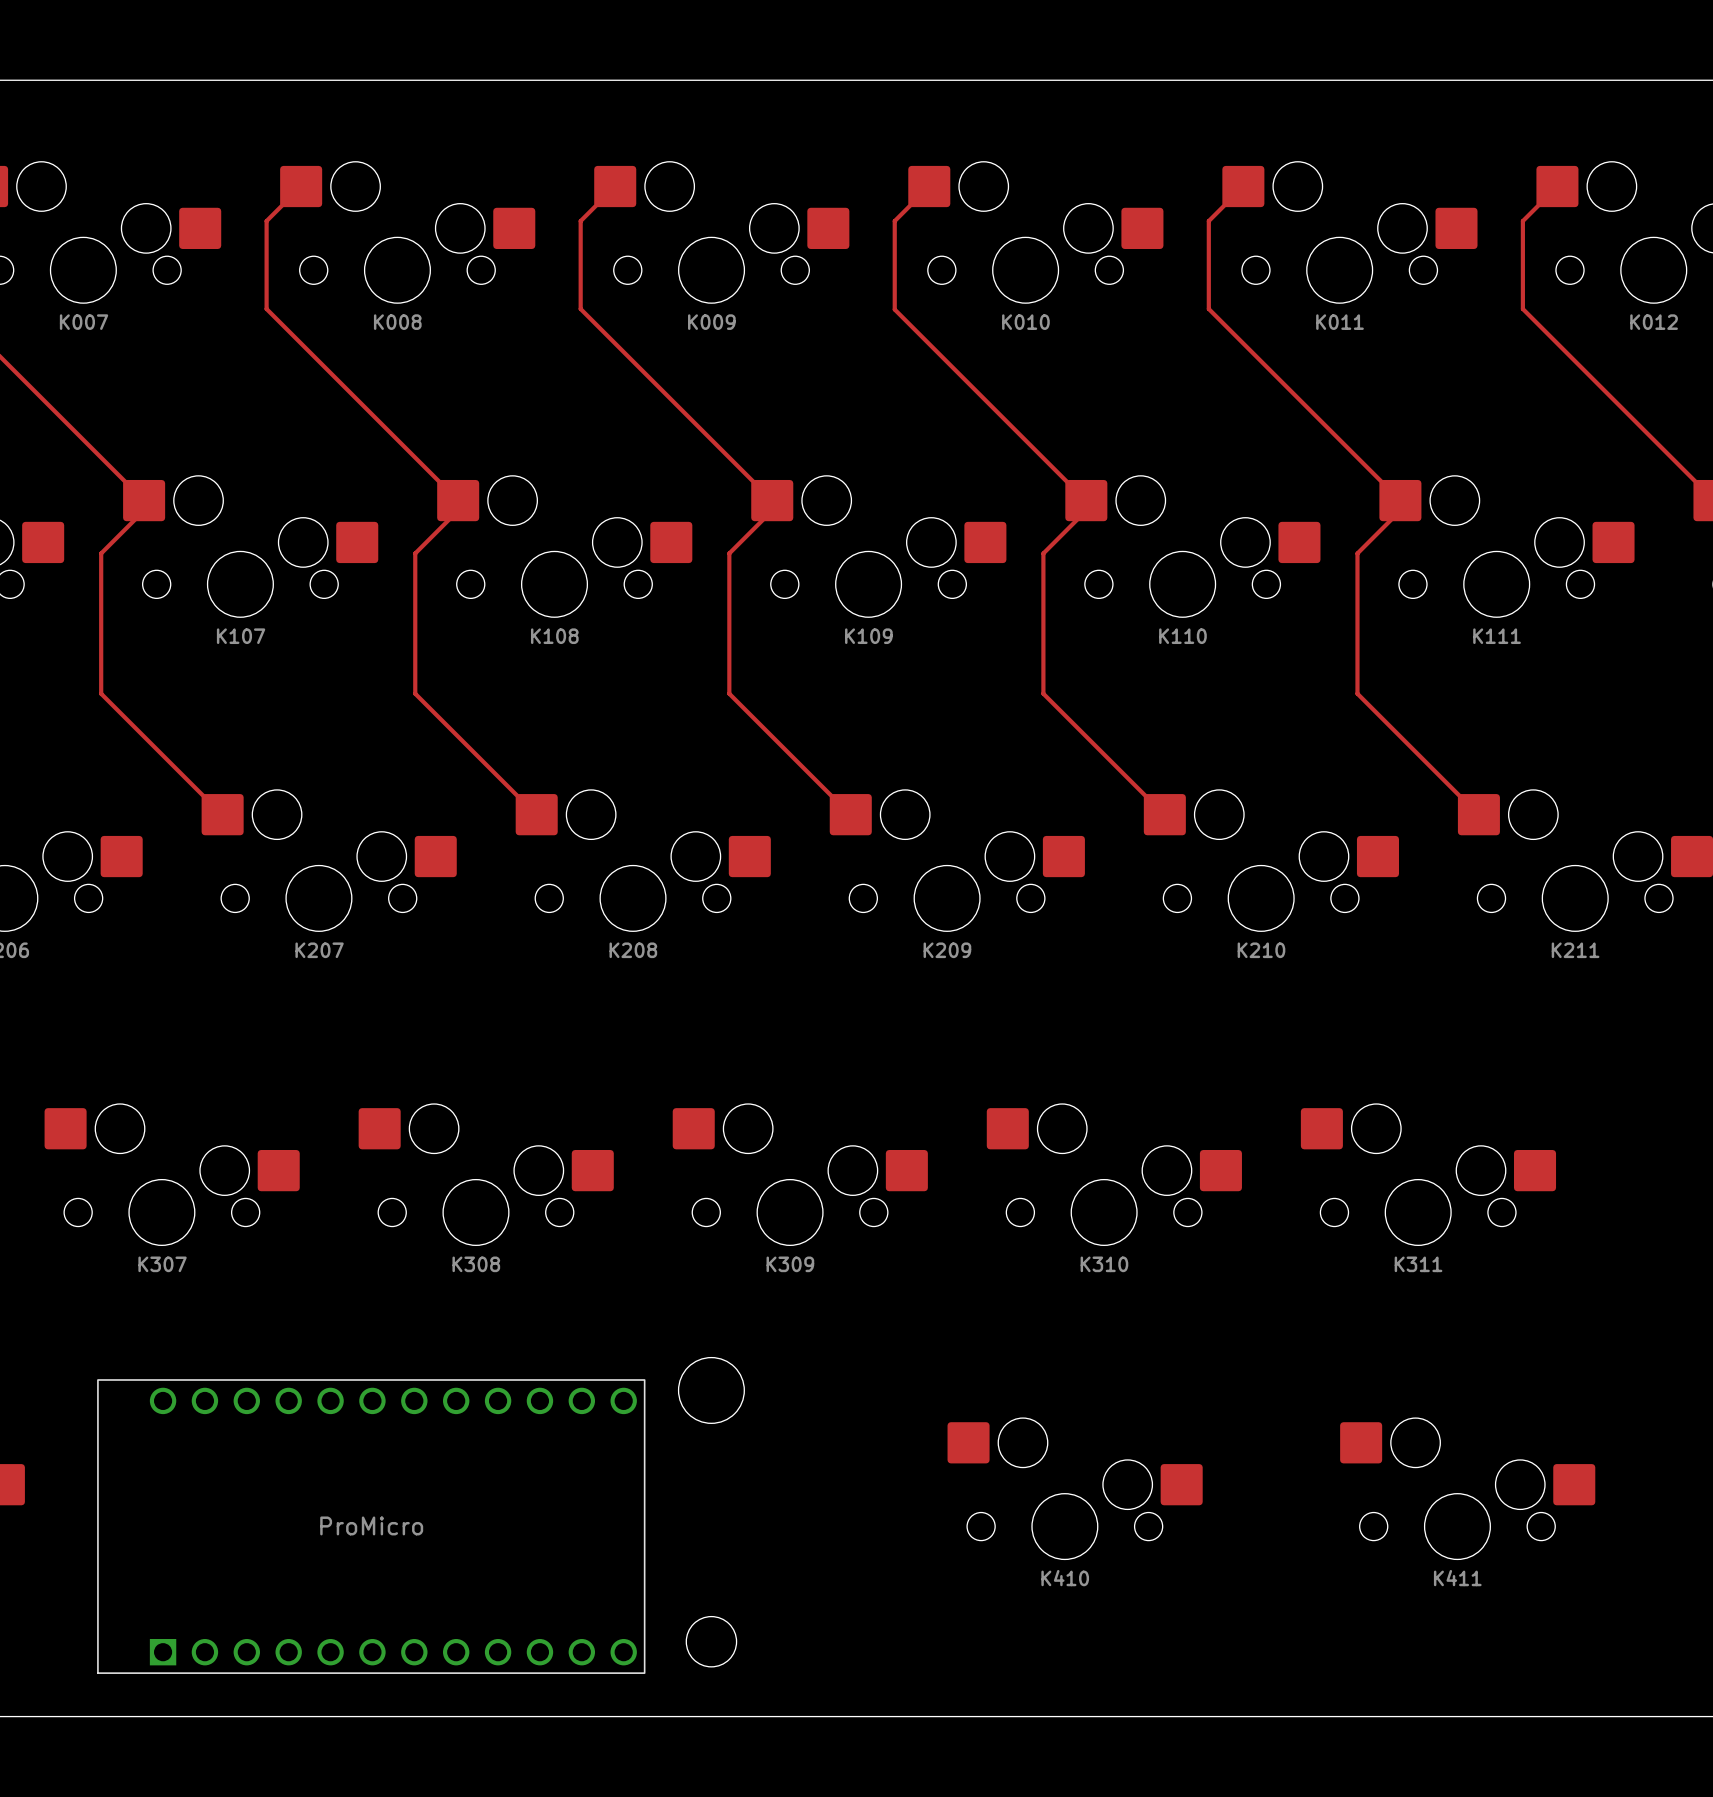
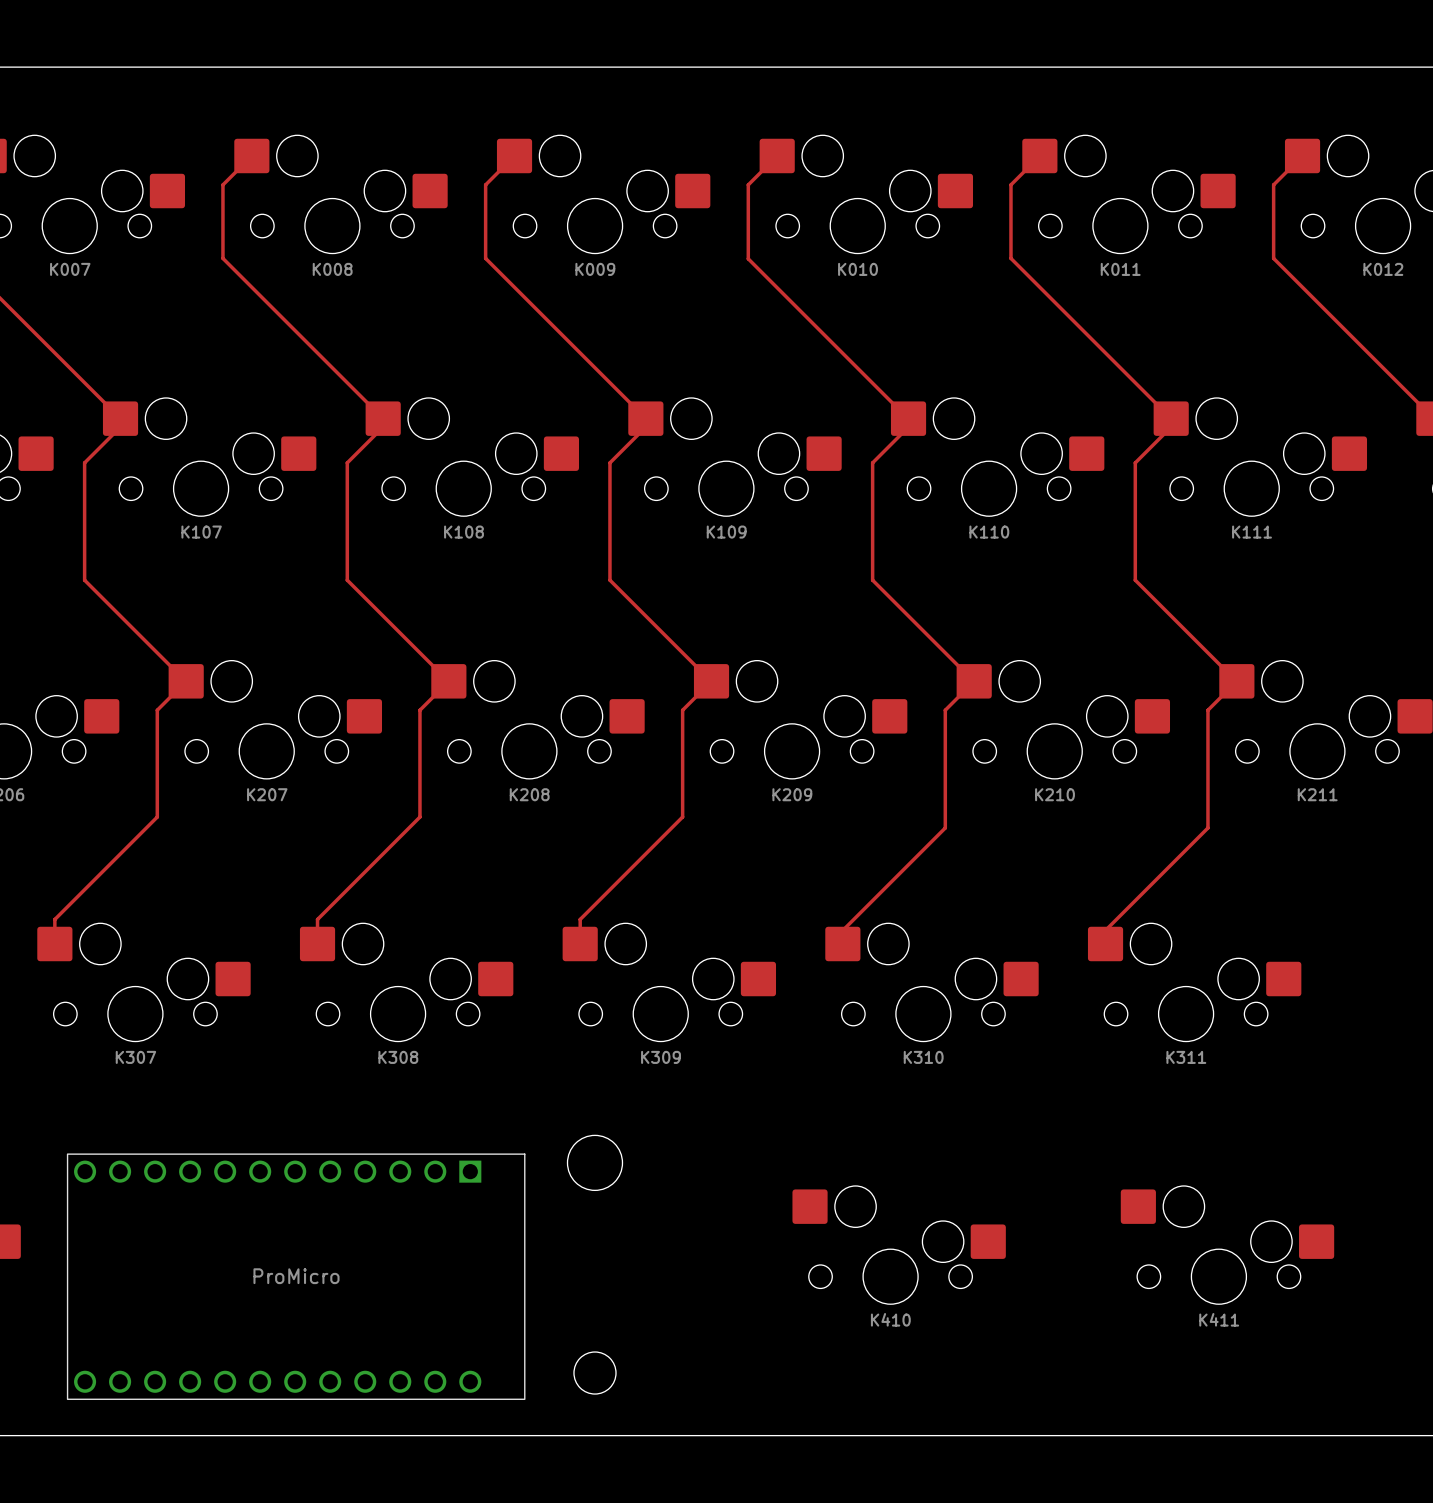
track: none -> (186, 681) (157, 710) (157, 817) (54, 919) (54, 943)
track: none -> (448, 681) (419, 710) (419, 817) (317, 919) (317, 943)
track: none -> (711, 681) (682, 710) (682, 817) (580, 919) (580, 943)
track: none -> (974, 681) (945, 710) (945, 827) (842, 930) (842, 943)
track: none -> (1236, 681) (1207, 710) (1207, 827) (1105, 930) (1105, 943)
part rotation: 0° (371, 1526) -> 180° (296, 1276)

